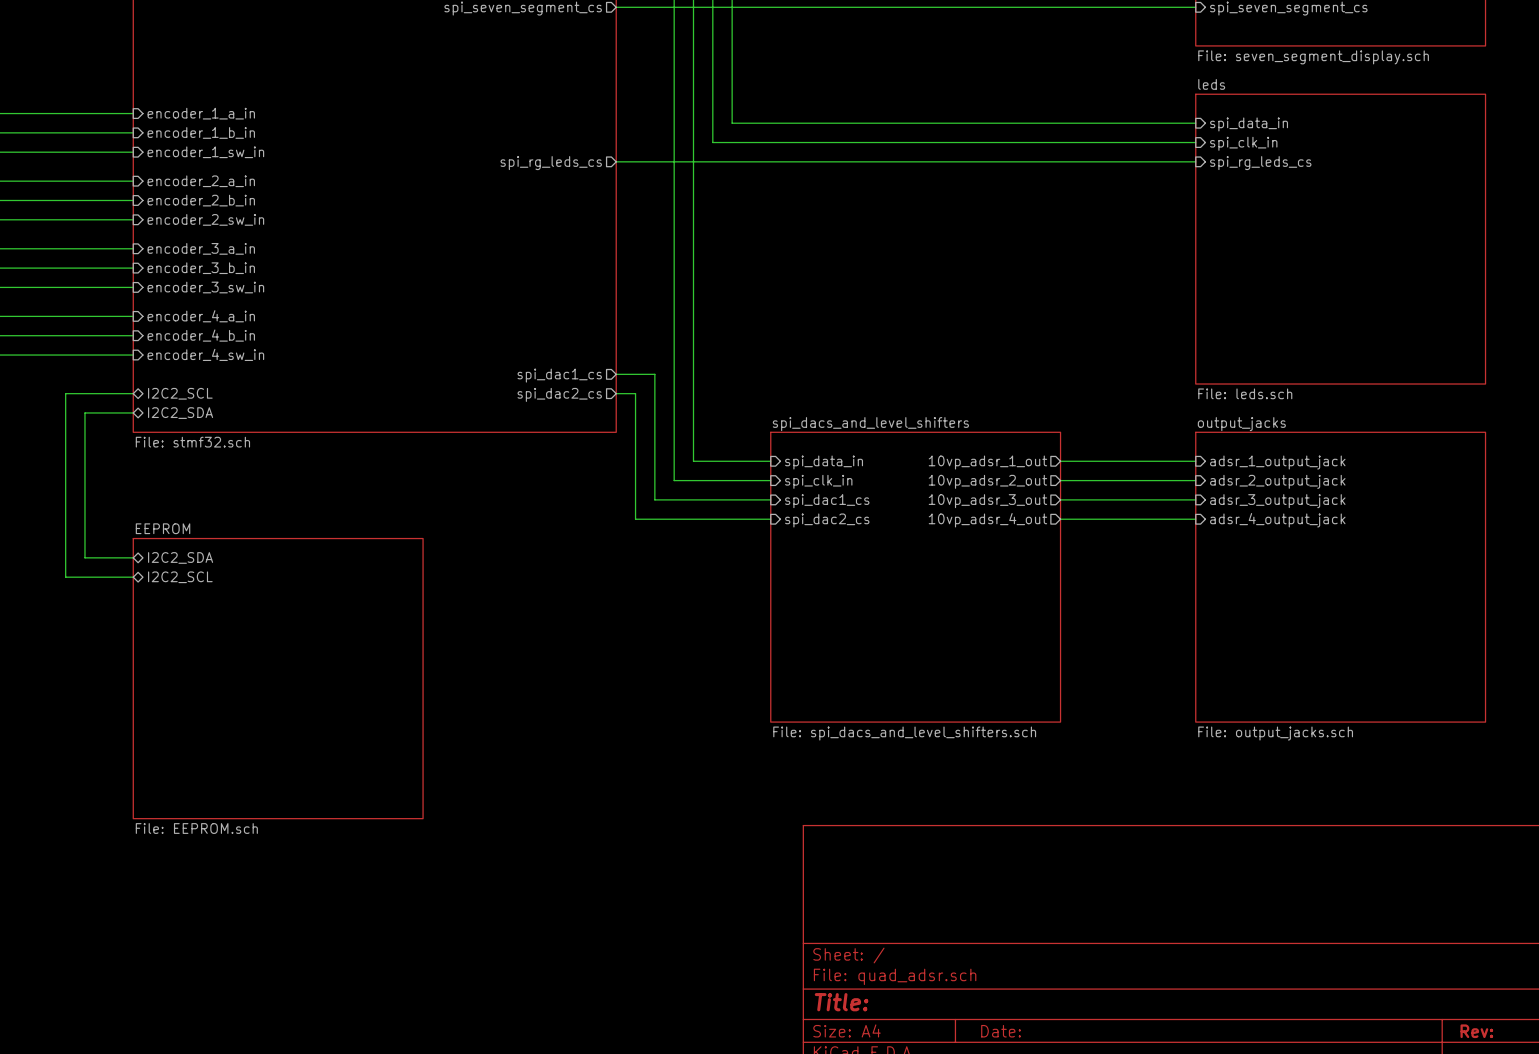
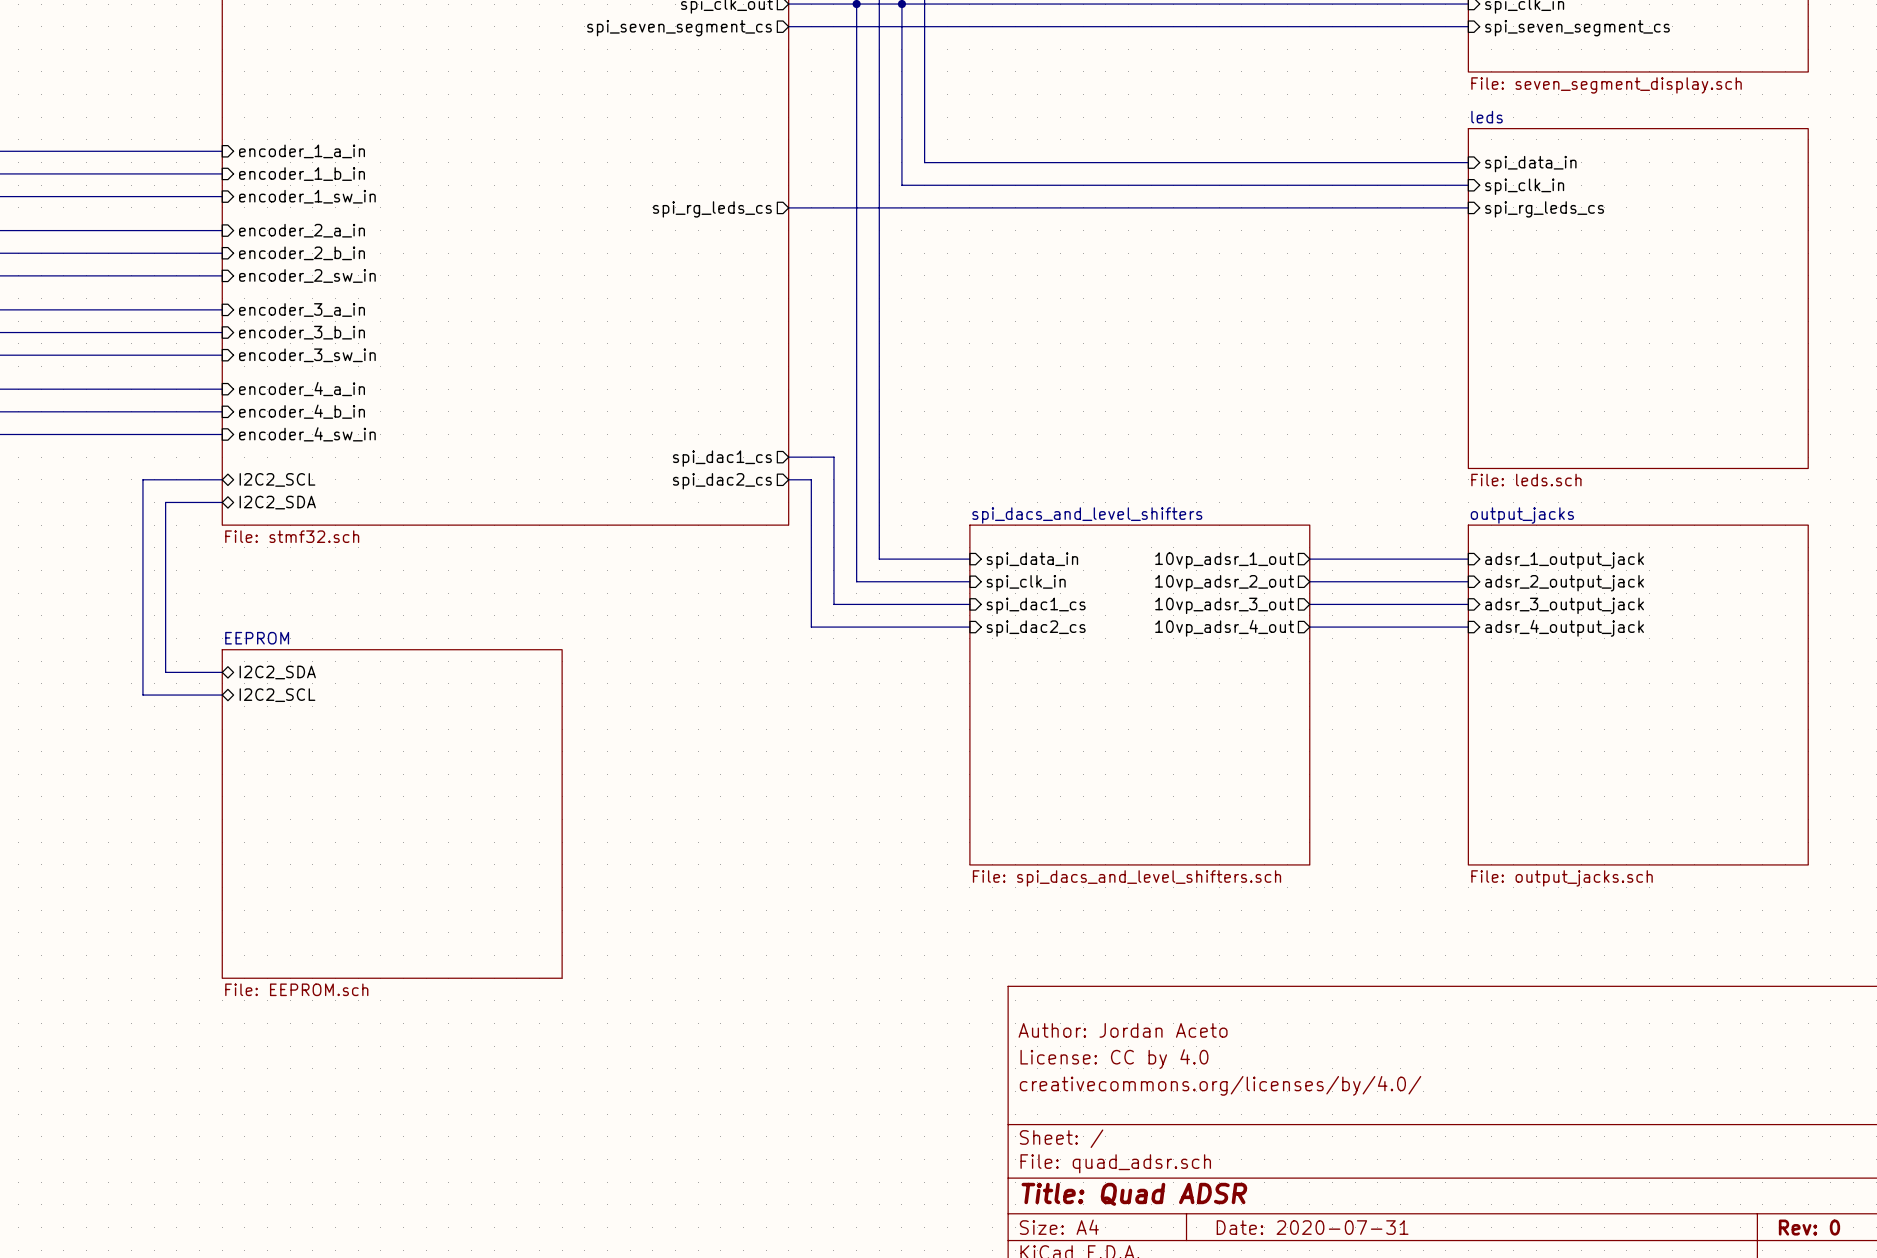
title block: none -> Author: Jordan Aceto (1123, 1030)
title block: none -> License: CC by 4.0 (1114, 1059)
title block: none -> creativecommons.org/licenses/by/4.0/ (1220, 1085)
title block: Title: (841, 1002) -> Title: Quad ADSR (1134, 1194)
title block: Date: (1001, 1031) -> Date: 2020-07-31 (1312, 1227)
title block: Rev: (1476, 1031) -> Rev: 0 (1809, 1227)

